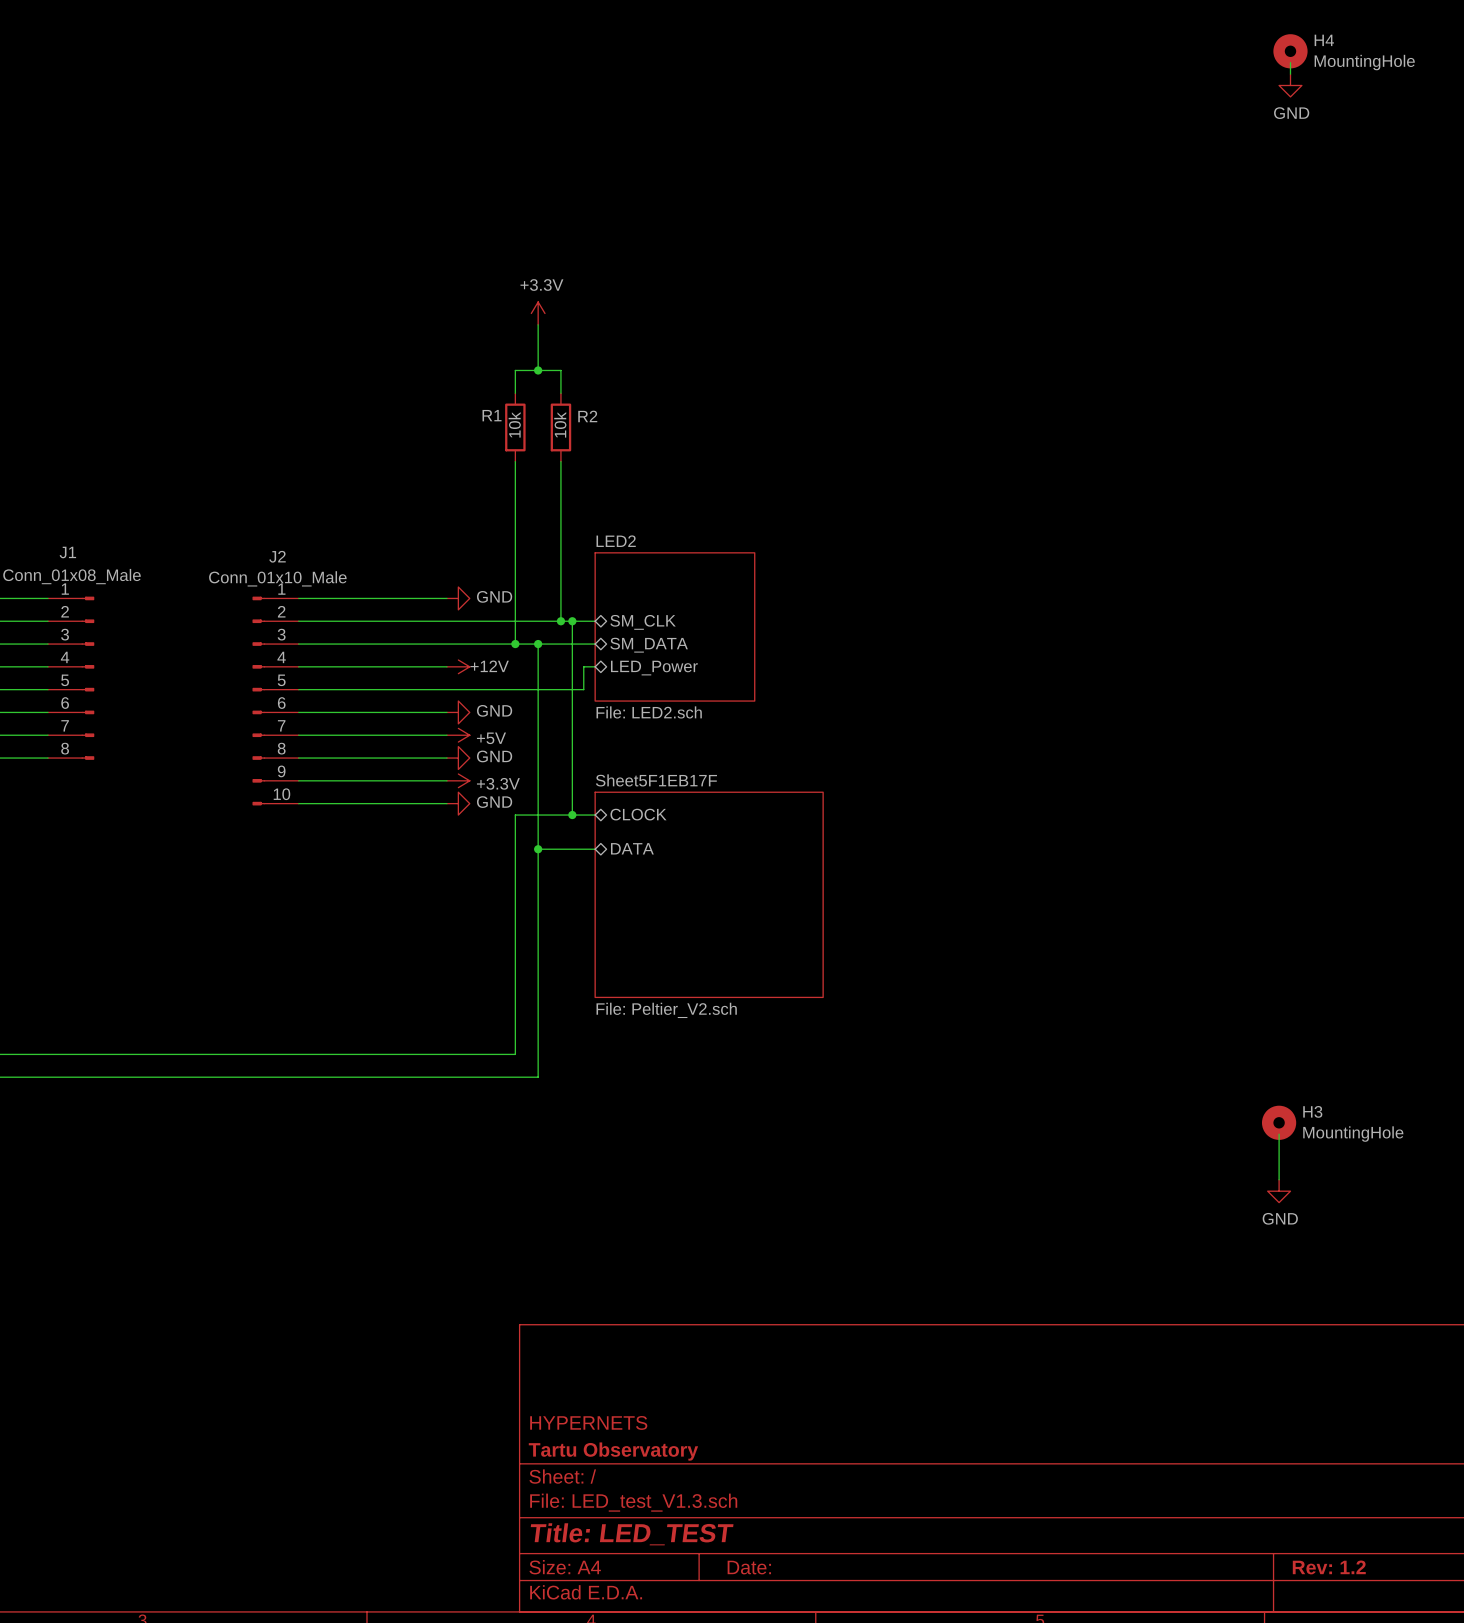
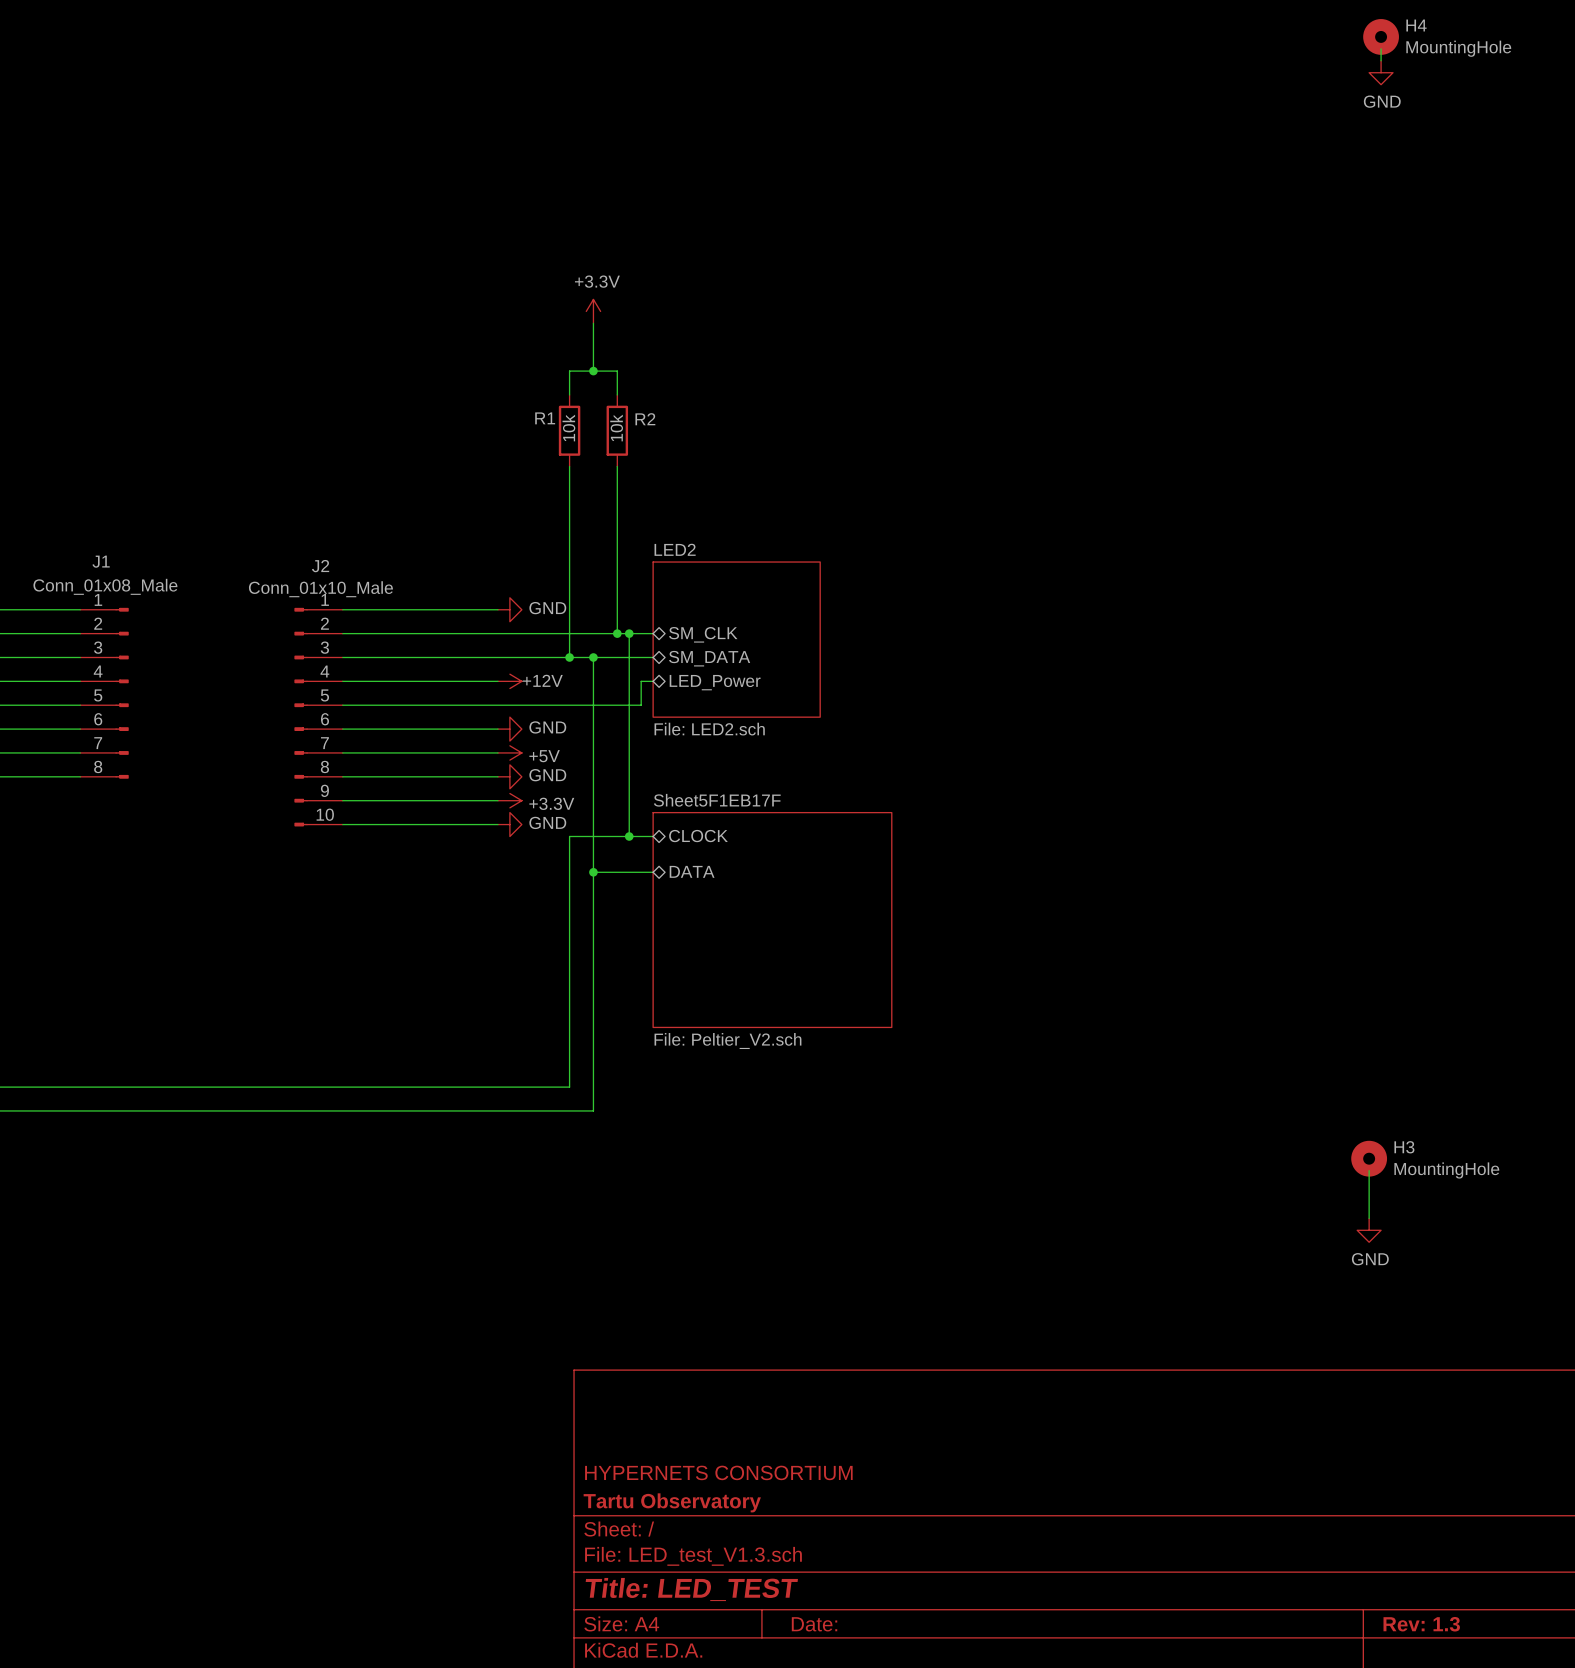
title block: HYPERNETS (588, 1422) -> HYPERNETS CONSORTIUM (718, 1472)
title block: Rev: 1.2 (1329, 1567) -> Rev: 1.3 (1421, 1624)

